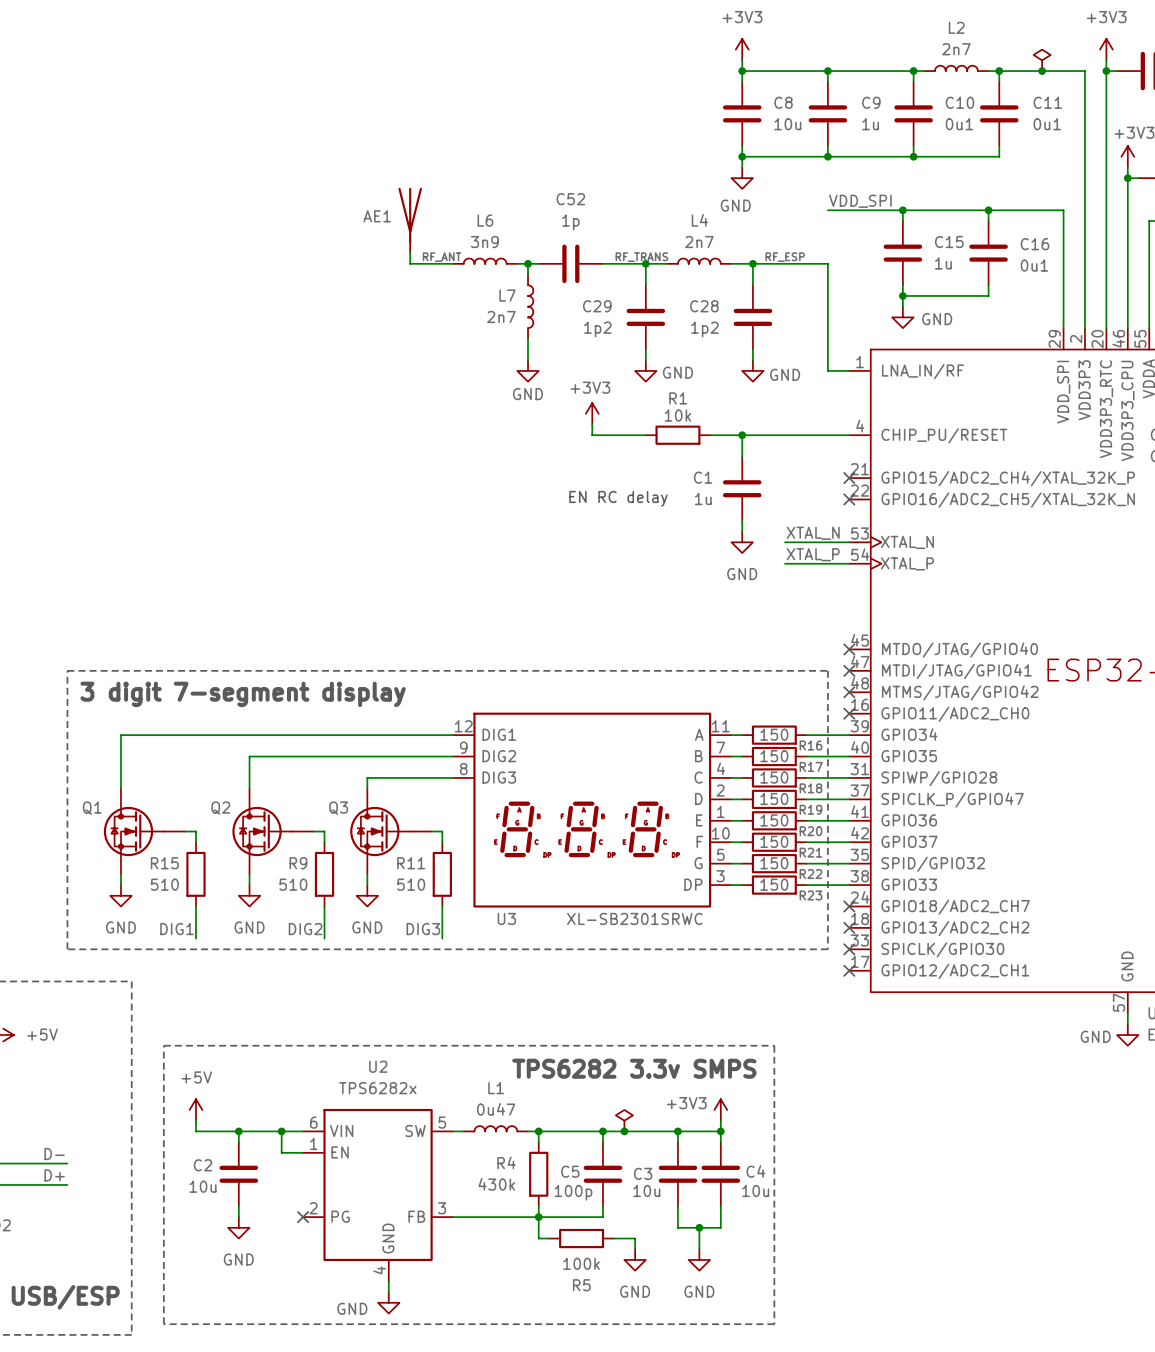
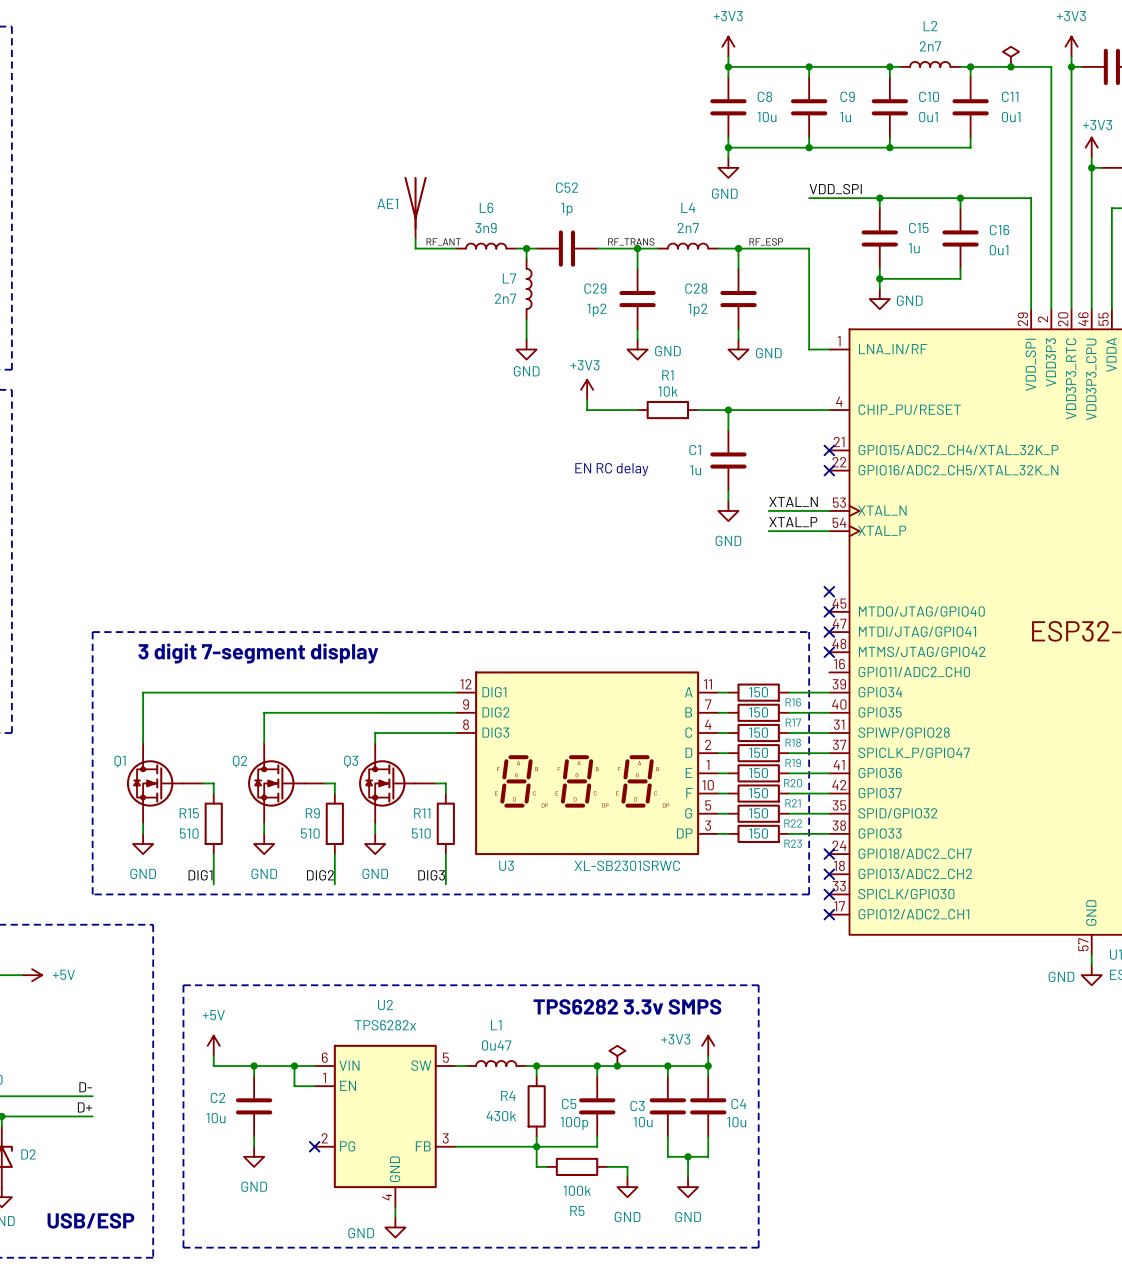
no-connect mark: none -> (829, 591)
no-connect mark: (849, 713) -> none

